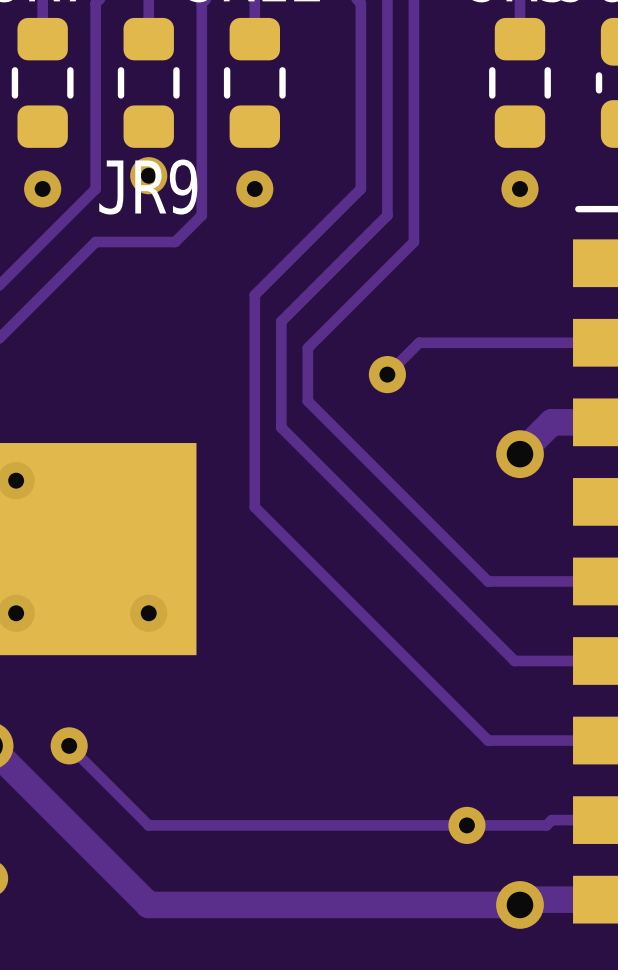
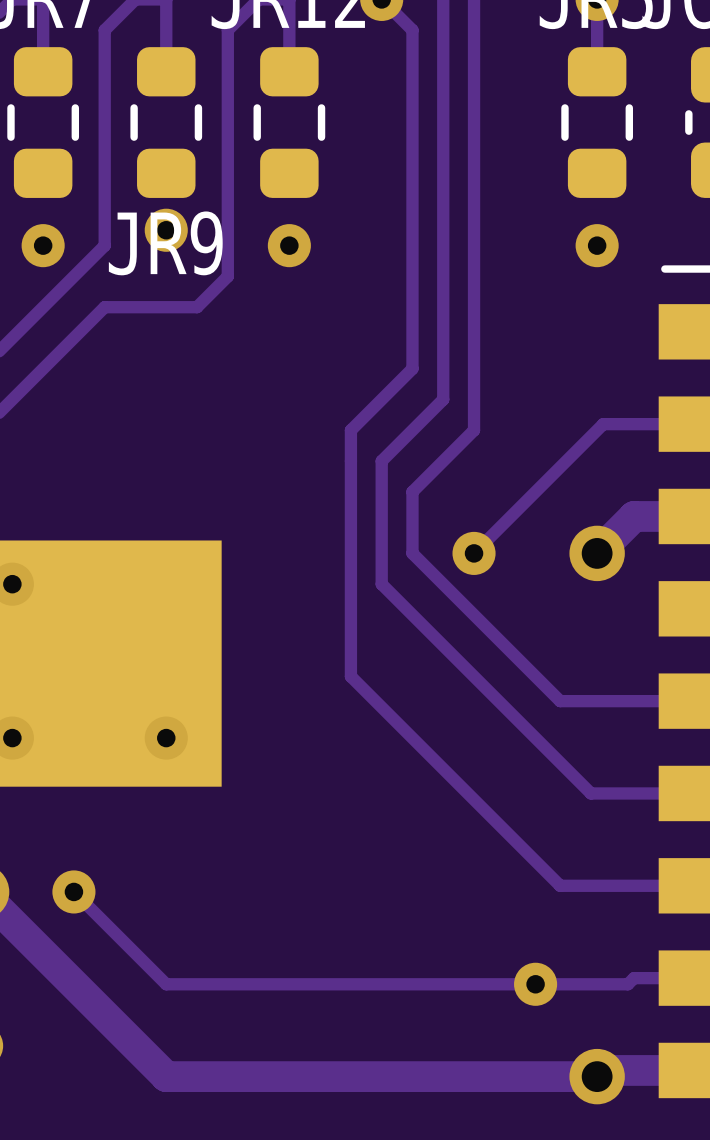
track: (360, 188) (254, 295) (254, 507) (307, 560) -> (350, 491) (350, 676)
track: (387, 215) (281, 321) (281, 427) (334, 480) -> (443, 276) (443, 399) (381, 461) (381, 584)
track: (413, 242) (360, 295) -> (412, 245) (412, 368)
track: none -> (474, 307) (474, 430)
track: (525, 342) (419, 342) (413, 348) -> (603, 424) (474, 553)
via position: (387, 374) -> (474, 553)
track: (307, 401) (360, 454) -> (443, 461) (412, 491) (412, 553)

